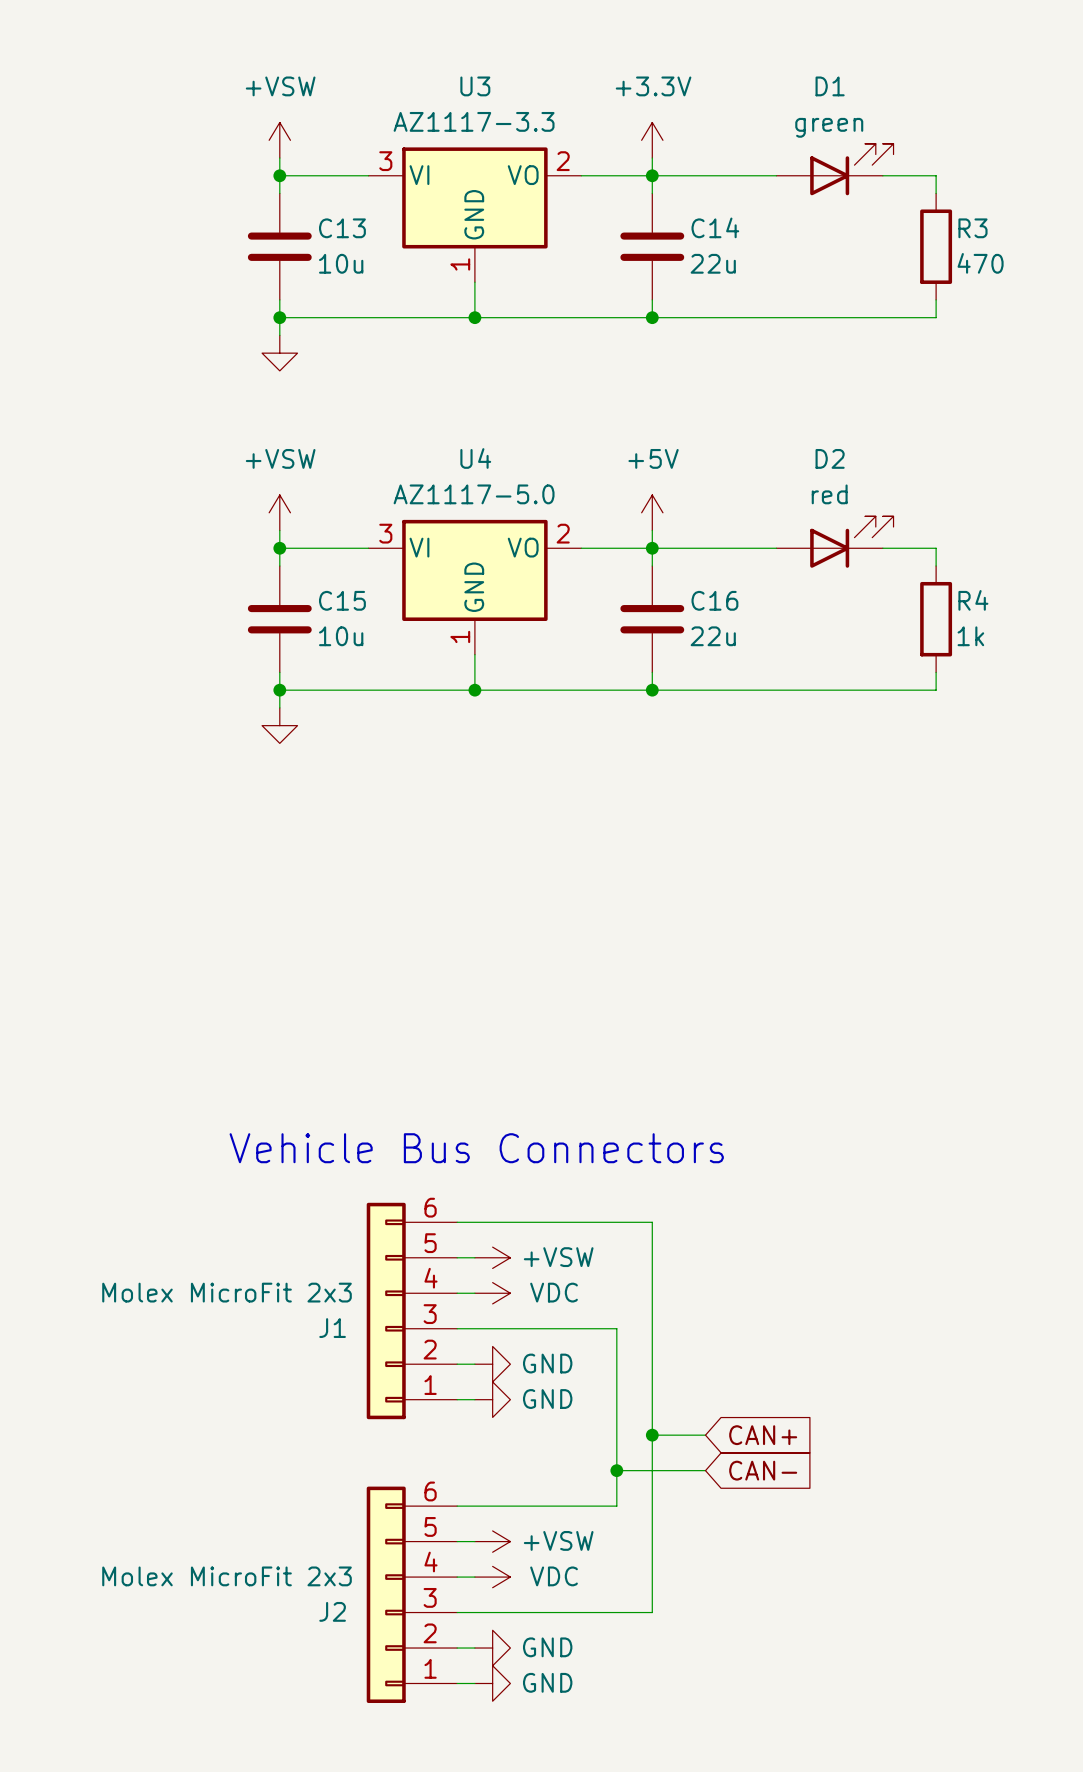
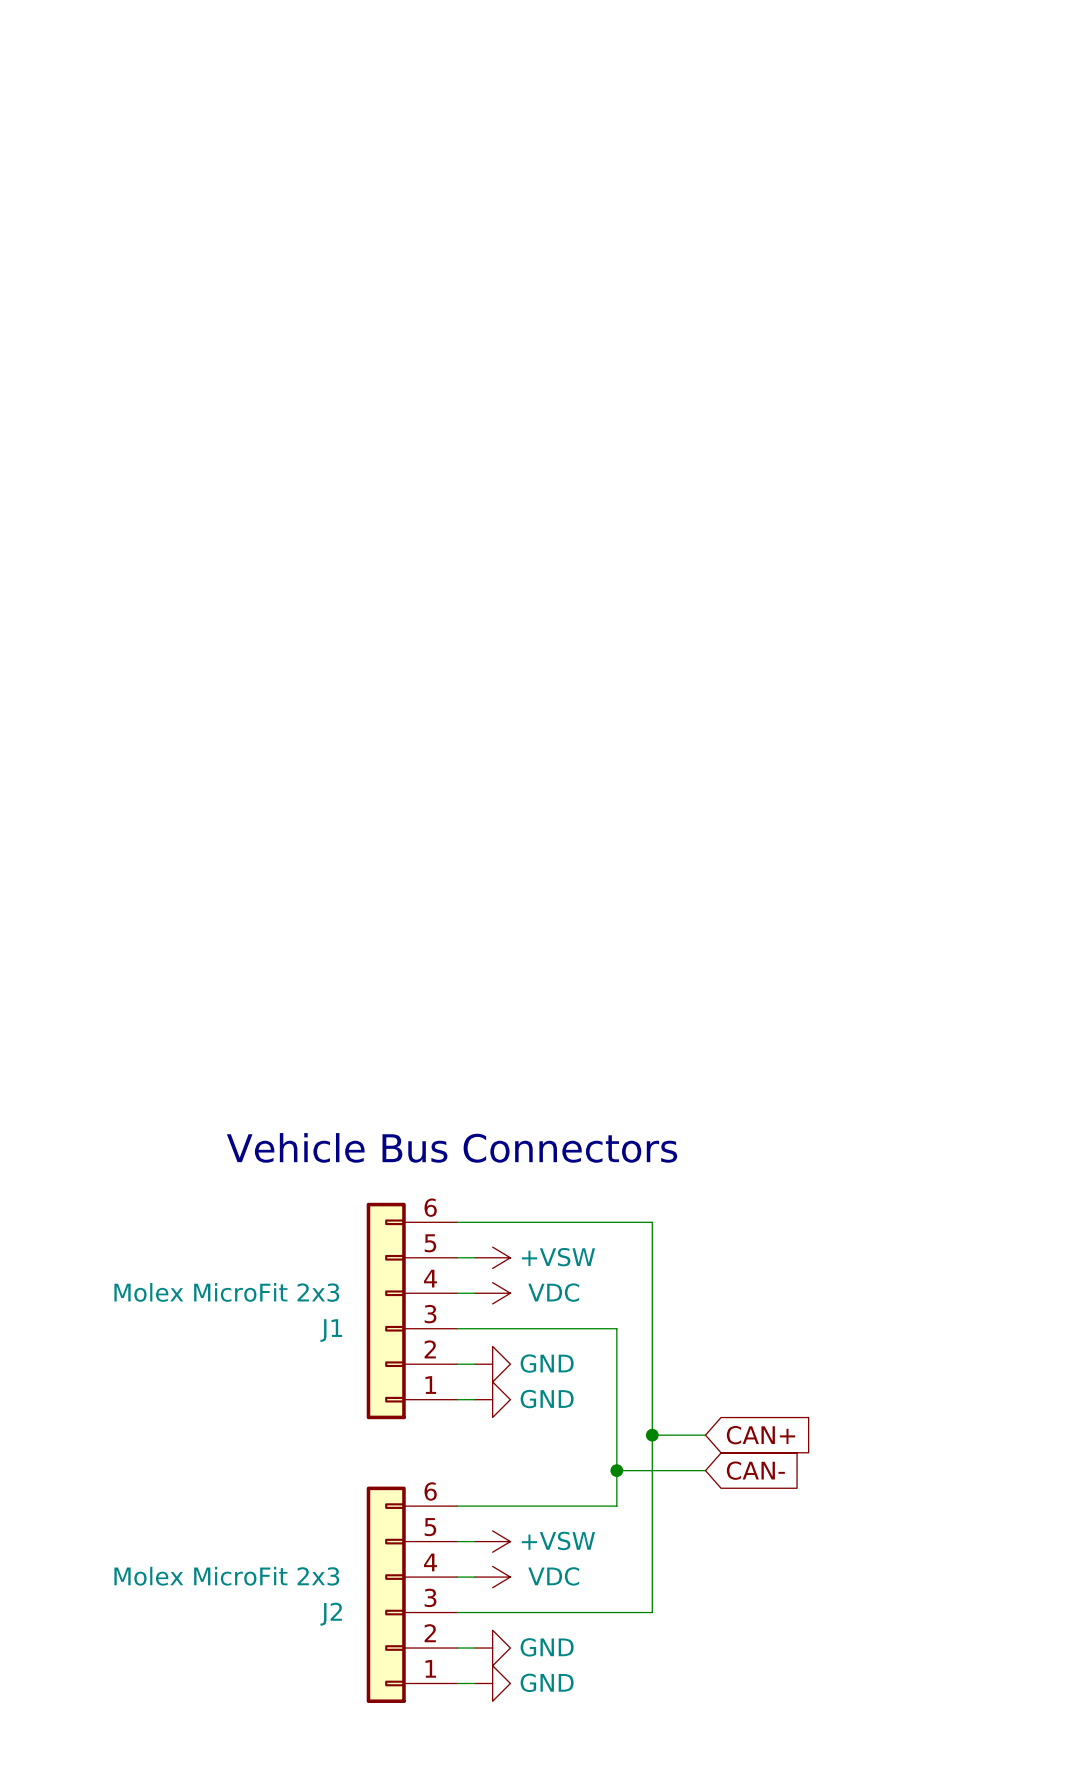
power symbol: +VSW (279, 140) -> none
power symbol: +3.3V (652, 140) -> none
wire: (279, 158) (279, 193) -> none
wire: (652, 158) (652, 193) -> none
D1: green (835, 169) -> none
wire: (279, 175) (368, 175) -> none
junction: (279, 175) -> none
wire: (581, 175) (776, 175) -> none
junction: (652, 175) -> none
wire: (882, 175) (936, 175) (936, 193) -> none
U3: AZ1117-3.3 (474, 214) -> none
C13: 10u (279, 246) -> none
C14: 22u (652, 246) -> none
R3: 470 (936, 246) -> none
wire: (474, 282) (474, 317) -> none
wire: (279, 299) (279, 335) -> none
wire: (652, 299) (652, 317) -> none
wire: (936, 299) (936, 317) (279, 317) -> none
junction: (279, 317) -> none
junction: (474, 317) -> none
junction: (652, 317) -> none
power symbol: (279, 353) -> none
power symbol: +VSW (279, 512) -> none
power symbol: +5V (652, 512) -> none
wire: (279, 530) (279, 566) -> none
wire: (652, 530) (652, 566) -> none
D2: red (835, 542) -> none
wire: (279, 548) (368, 548) -> none
junction: (279, 548) -> none
wire: (581, 548) (776, 548) -> none
junction: (652, 548) -> none
wire: (882, 548) (936, 548) (936, 566) -> none
U4: AZ1117-5.0 (474, 587) -> none
C15: 10u (279, 619) -> none
C16: 22u (652, 619) -> none
R4: 1k (936, 619) -> none
wire: (474, 654) (474, 690) -> none
wire: (279, 672) (279, 707) -> none
wire: (652, 672) (652, 690) -> none
wire: (936, 672) (936, 690) (279, 690) -> none
junction: (279, 690) -> none
junction: (474, 690) -> none
junction: (652, 690) -> none
power symbol: (279, 725) -> none

